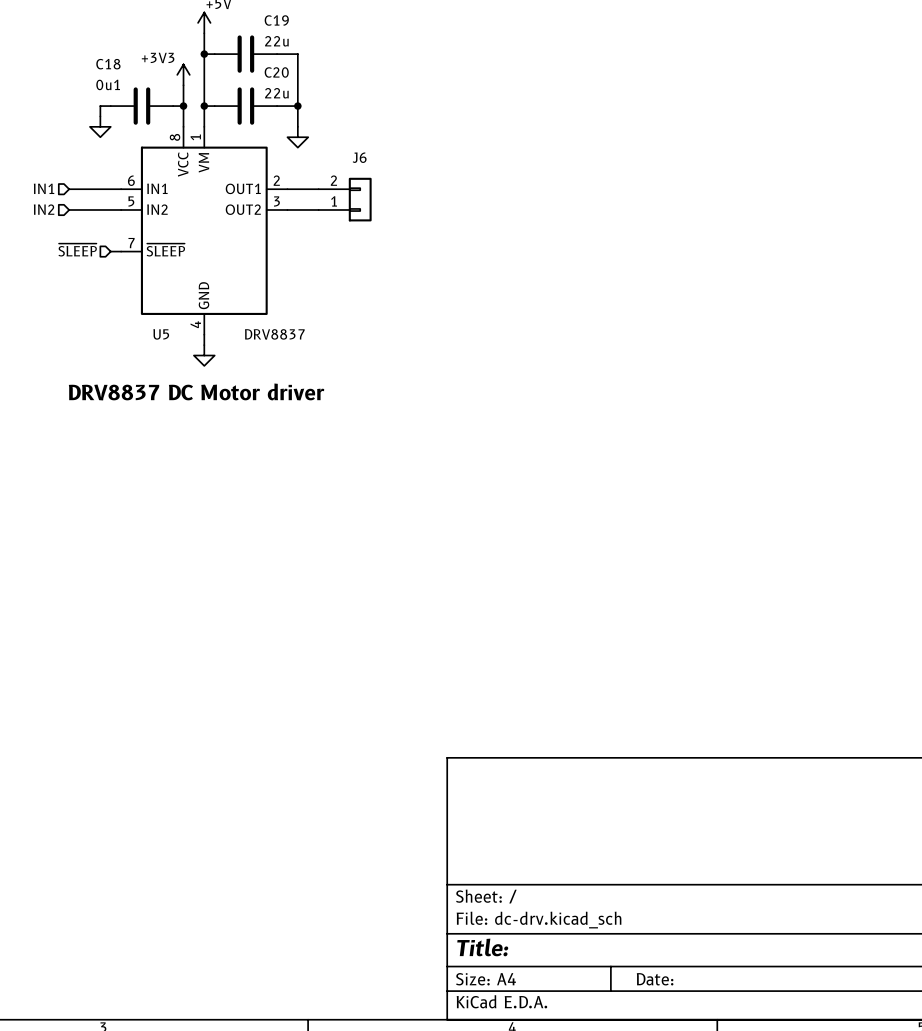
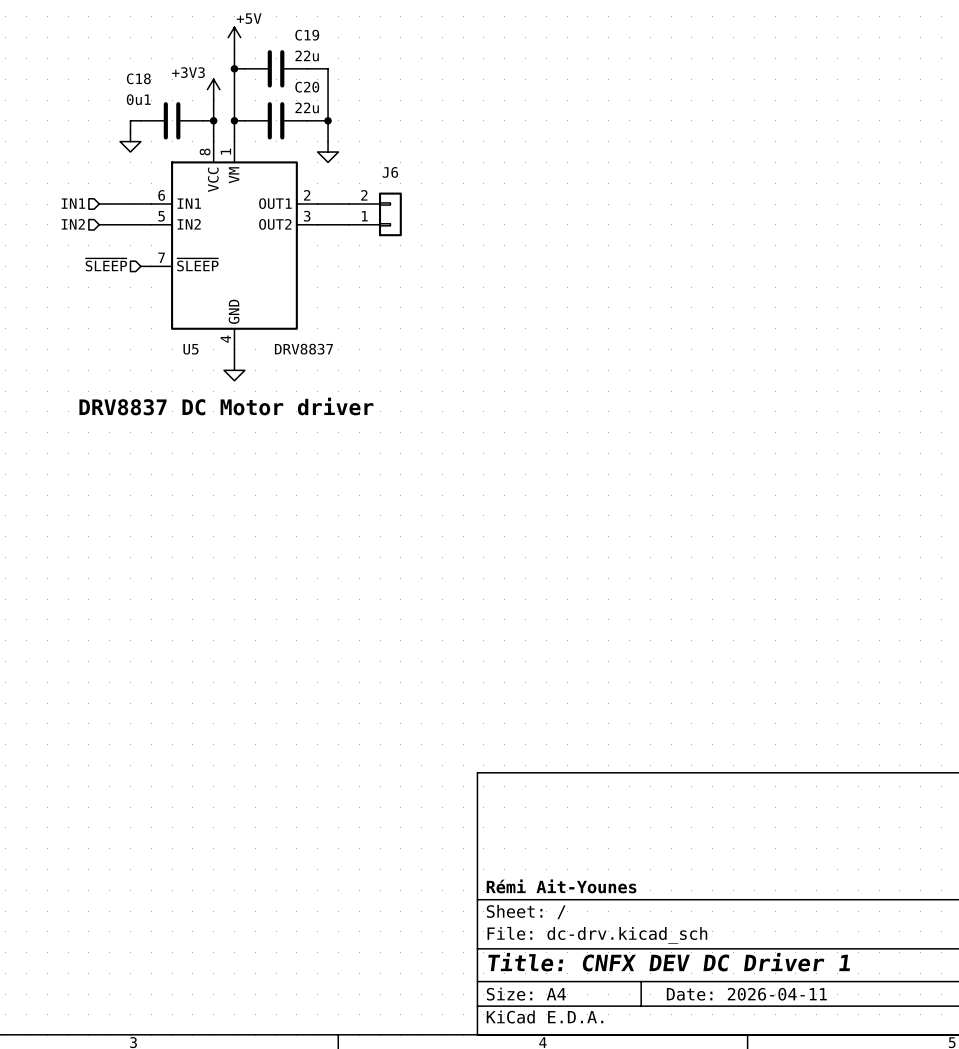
title block: none -> Rémi Ait-Younes (561, 886)
title block: Title: (482, 947) -> Title: CNFX DEV DC Driver 1 (669, 962)
title block: Date: (655, 979) -> Date: 2026-04-11 (746, 994)

